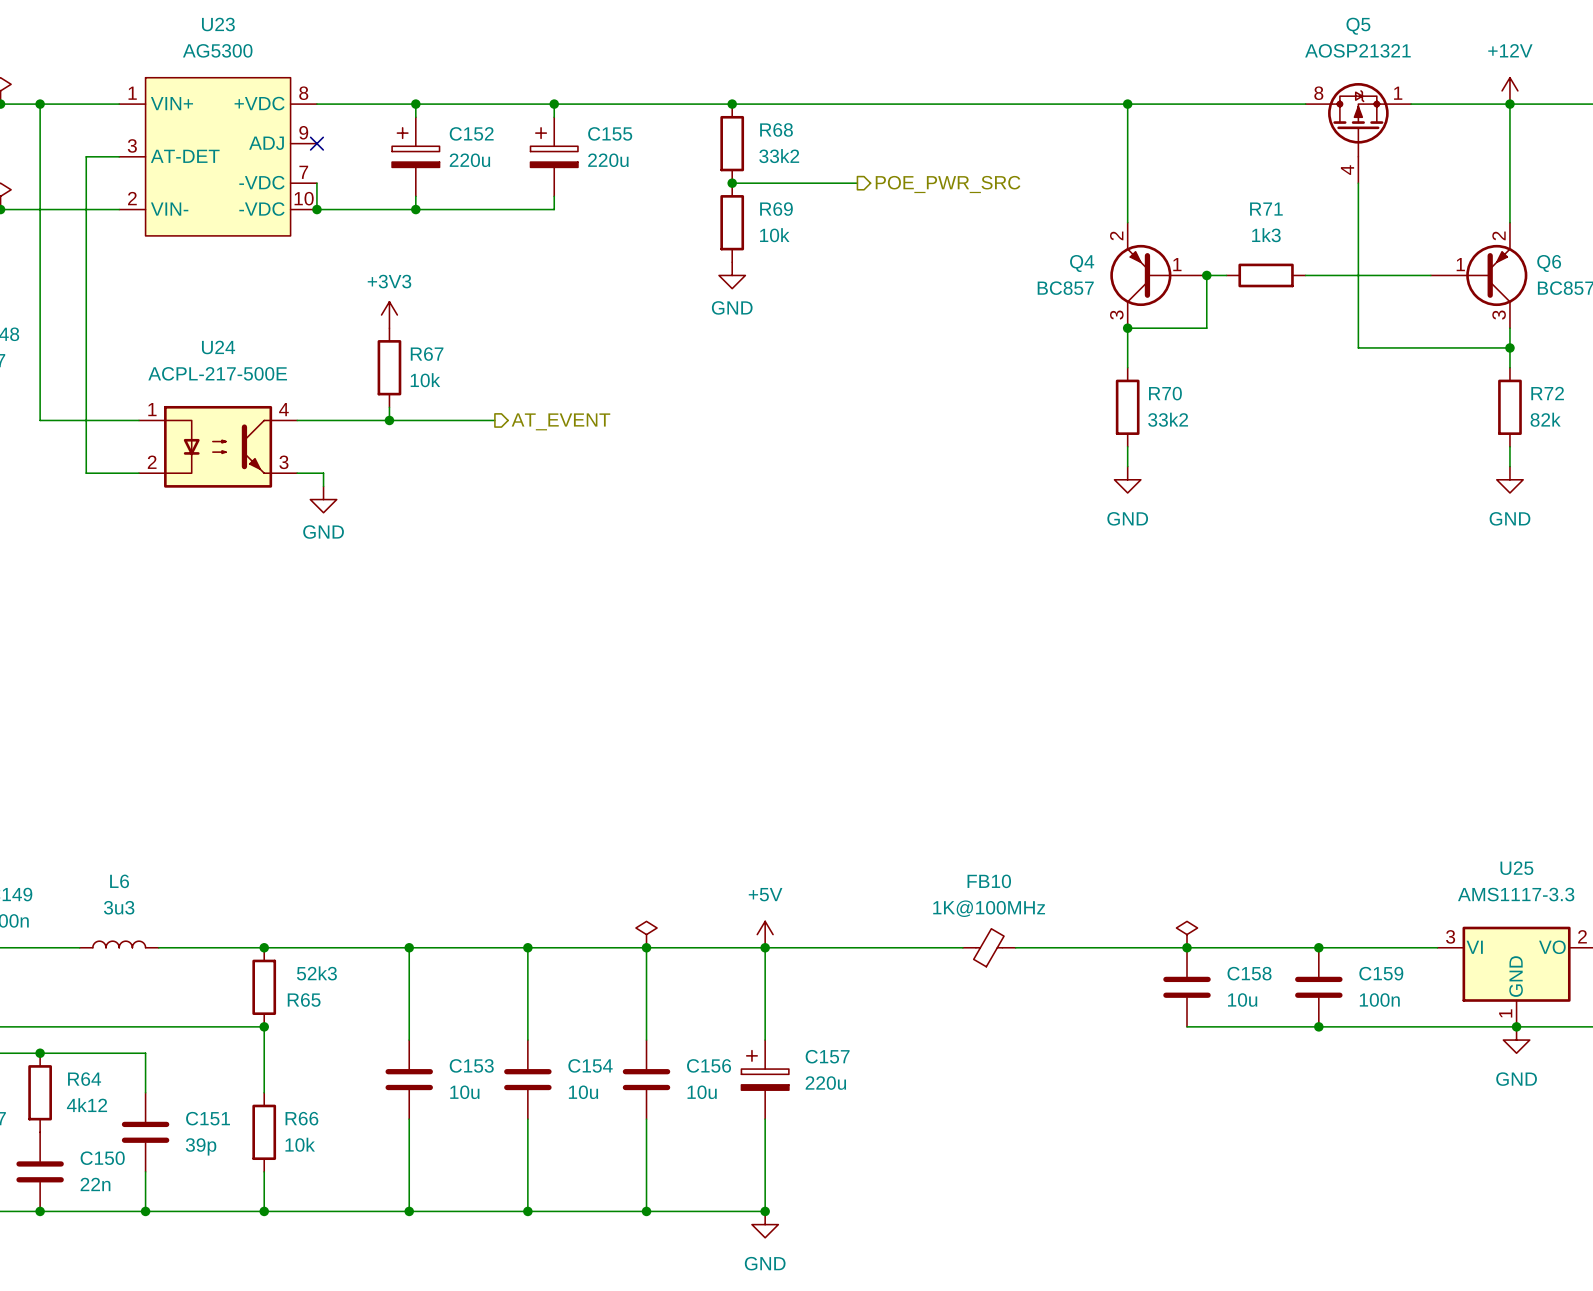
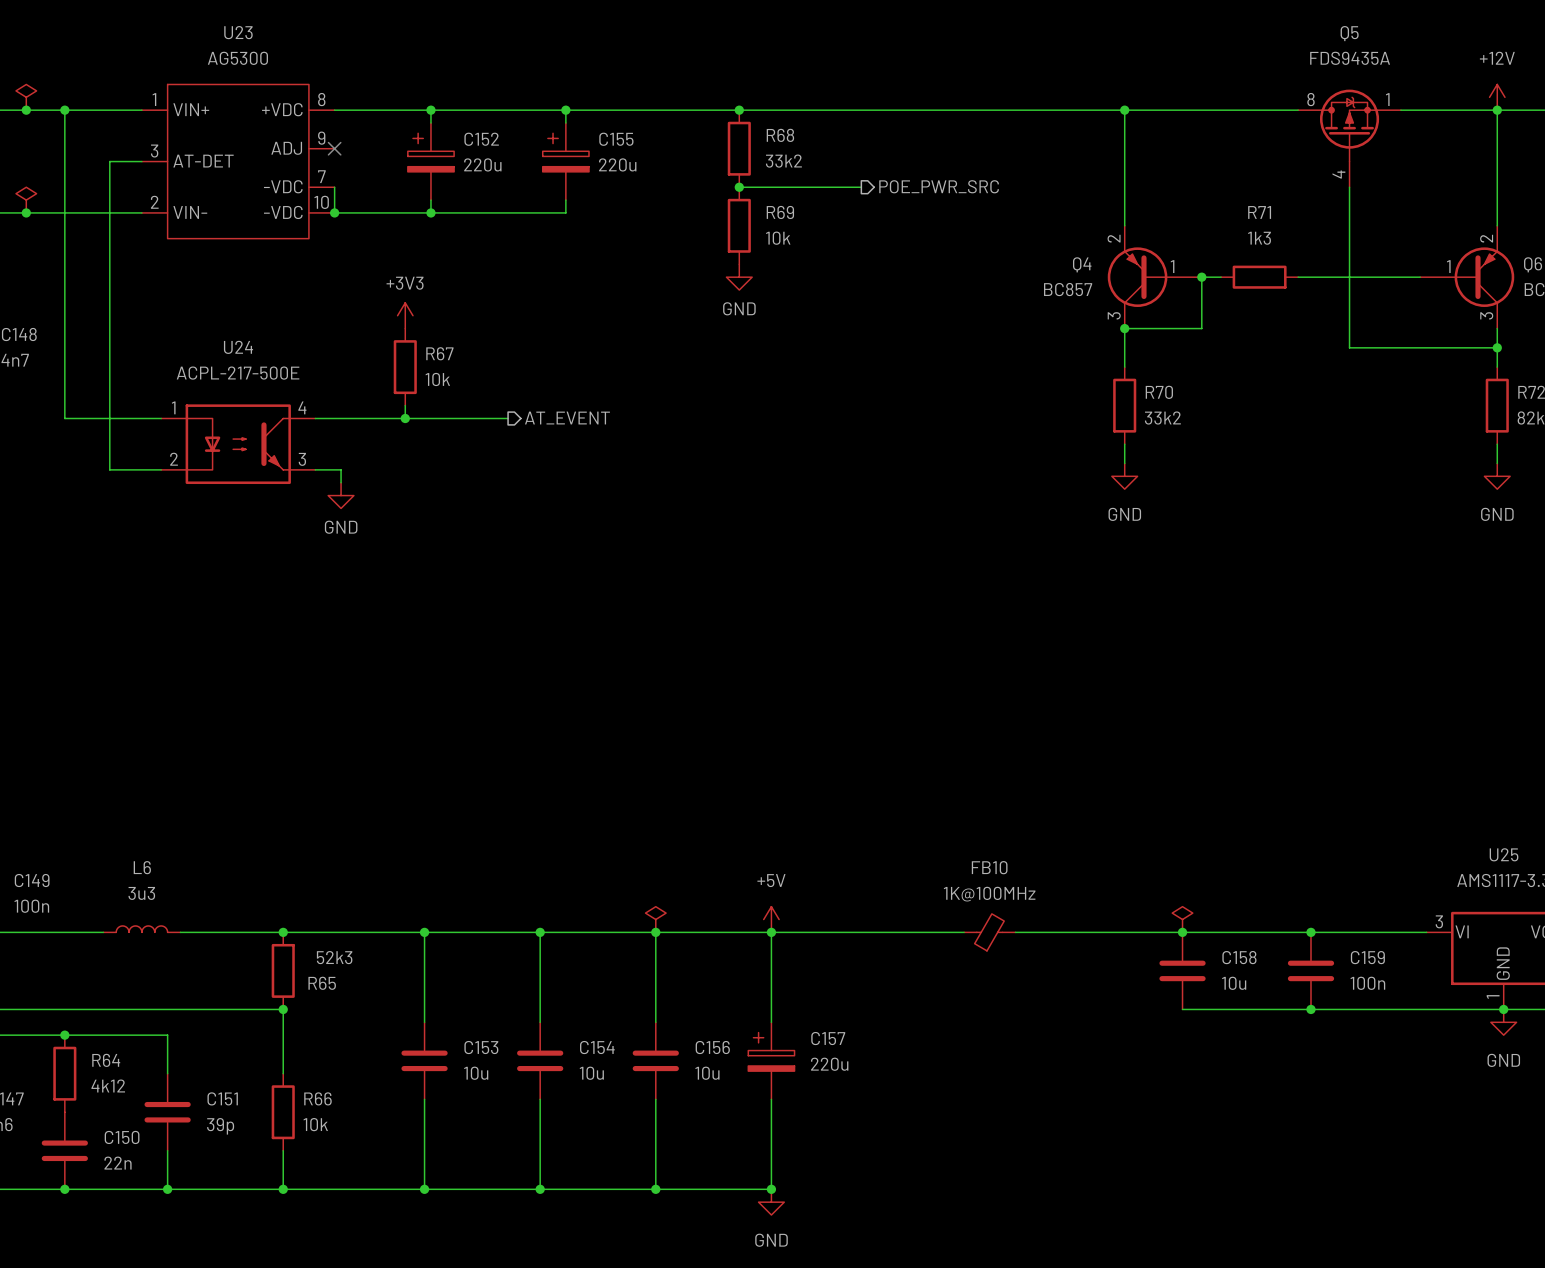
Q5 value: AOSP21321 (1357, 50) -> FDS9435A (1350, 58)

